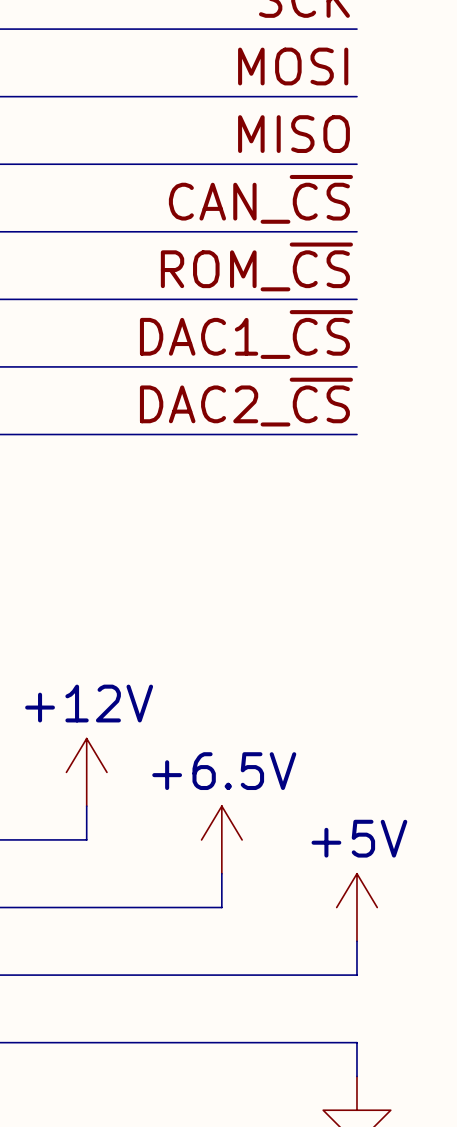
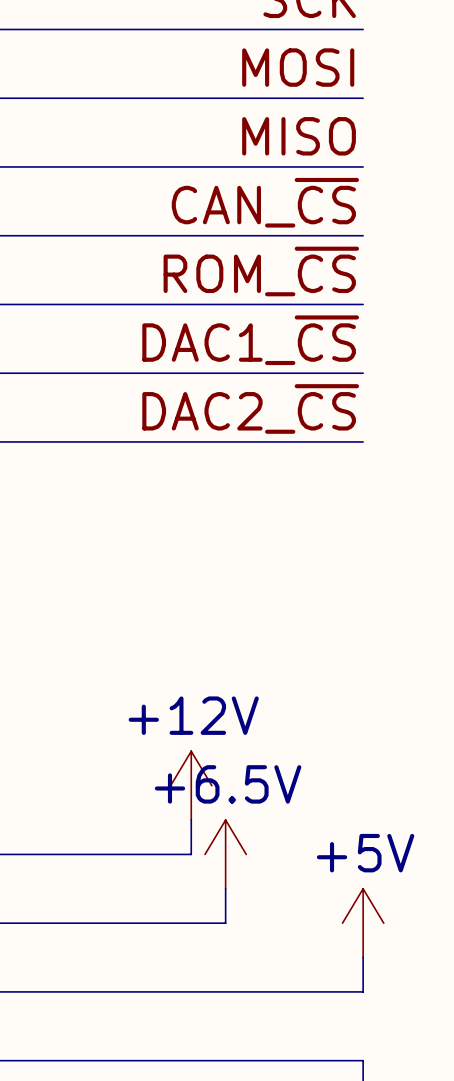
power symbol position: +12V (86, 772) -> +12V (191, 785)
wire: (86, 806) (86, 839) -> (191, 820) (191, 854) (88, 854)

